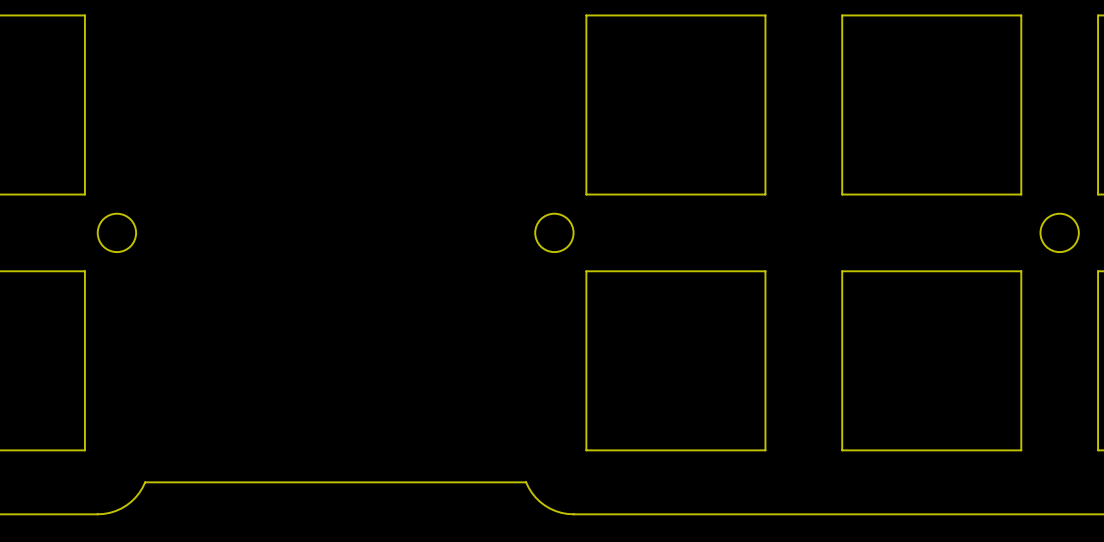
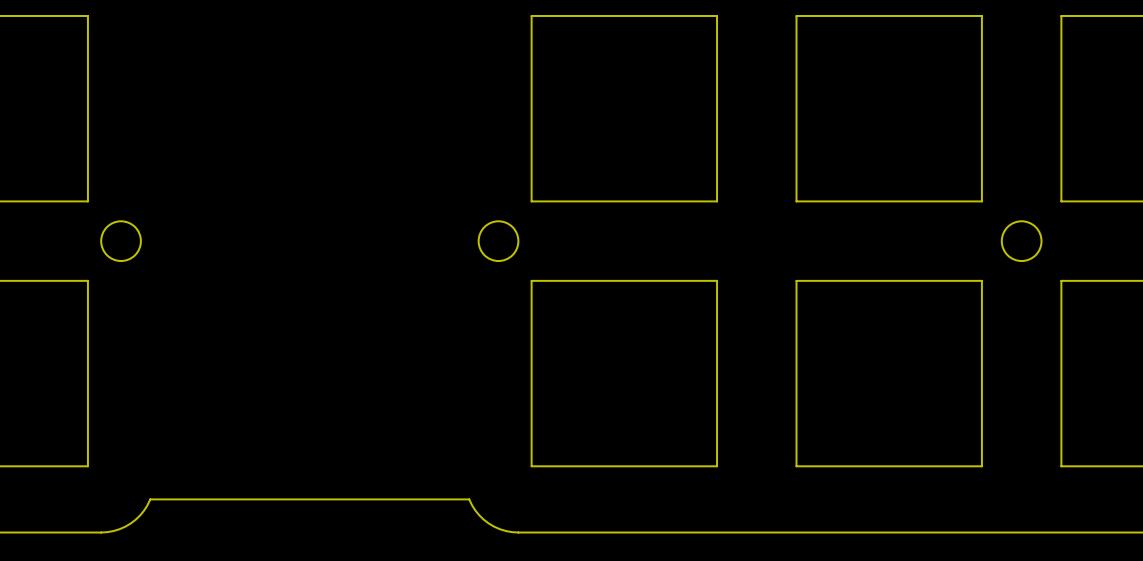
board edge: (586, 15) (586, 194) -> (607, 15) (531, 15) (531, 201) (607, 201)
board edge: (692, 15) (765, 15) (765, 194) (692, 194) -> (717, 15) (717, 201)
board edge: (842, 15) (842, 194) -> (871, 15) (796, 15) (796, 201) (871, 201)
board edge: (948, 15) (1021, 15) (1021, 194) (948, 194) -> (981, 15) (981, 201)
board edge: (1098, 15) (1098, 194) -> (1136, 15) (1061, 15) (1061, 201) (1136, 201)
round board edge position: (554, 232) -> (498, 241)
round board edge position: (1059, 232) -> (1021, 241)
board edge: (586, 271) (586, 450) -> (607, 280) (531, 280) (531, 466) (607, 466)
board edge: (692, 271) (765, 271) (765, 450) (692, 450) -> (717, 280) (717, 466)
board edge: (842, 271) (842, 450) -> (871, 280) (796, 280) (796, 466) (871, 466)
board edge: (948, 271) (1021, 271) (1021, 450) (948, 450) -> (981, 280) (981, 466)
board edge: (1098, 271) (1098, 450) -> (1136, 280) (1061, 280) (1061, 466) (1136, 466)
board edge: (453, 482) (526, 482) (535, 497) (544, 505) (555, 511) (573, 514) -> (469, 499) (483, 519) (505, 531) (593, 532)

